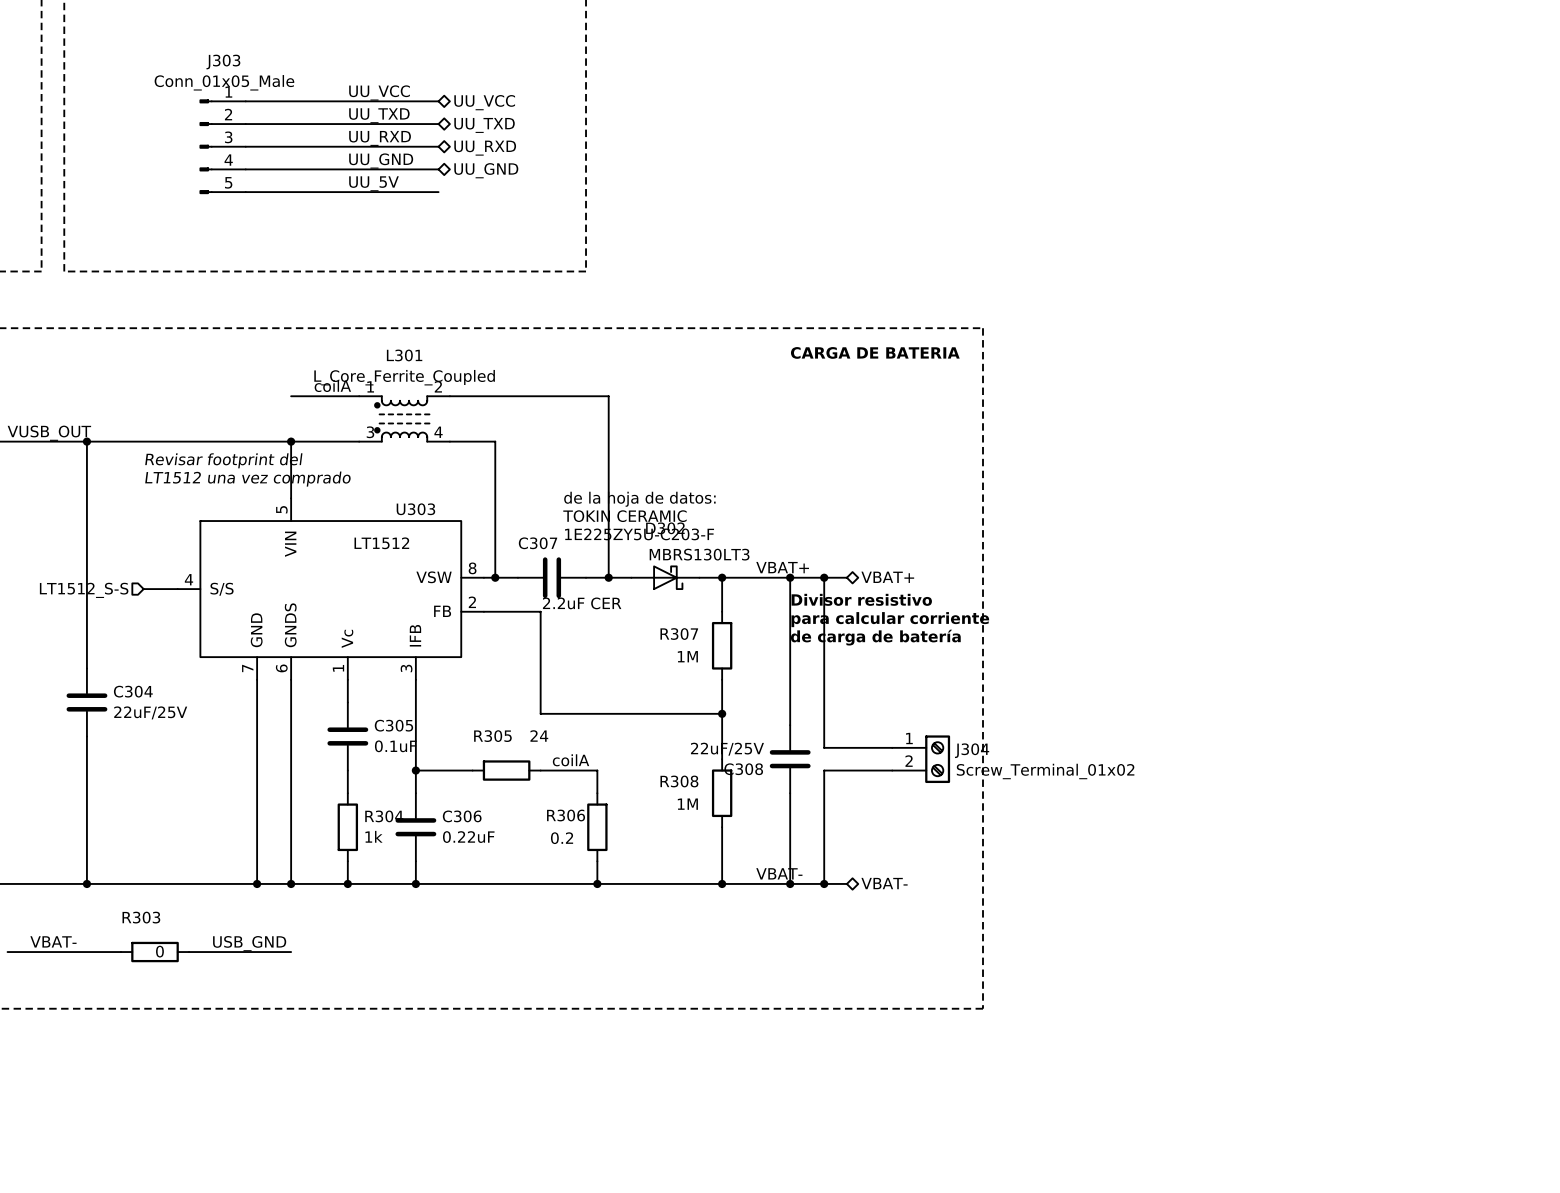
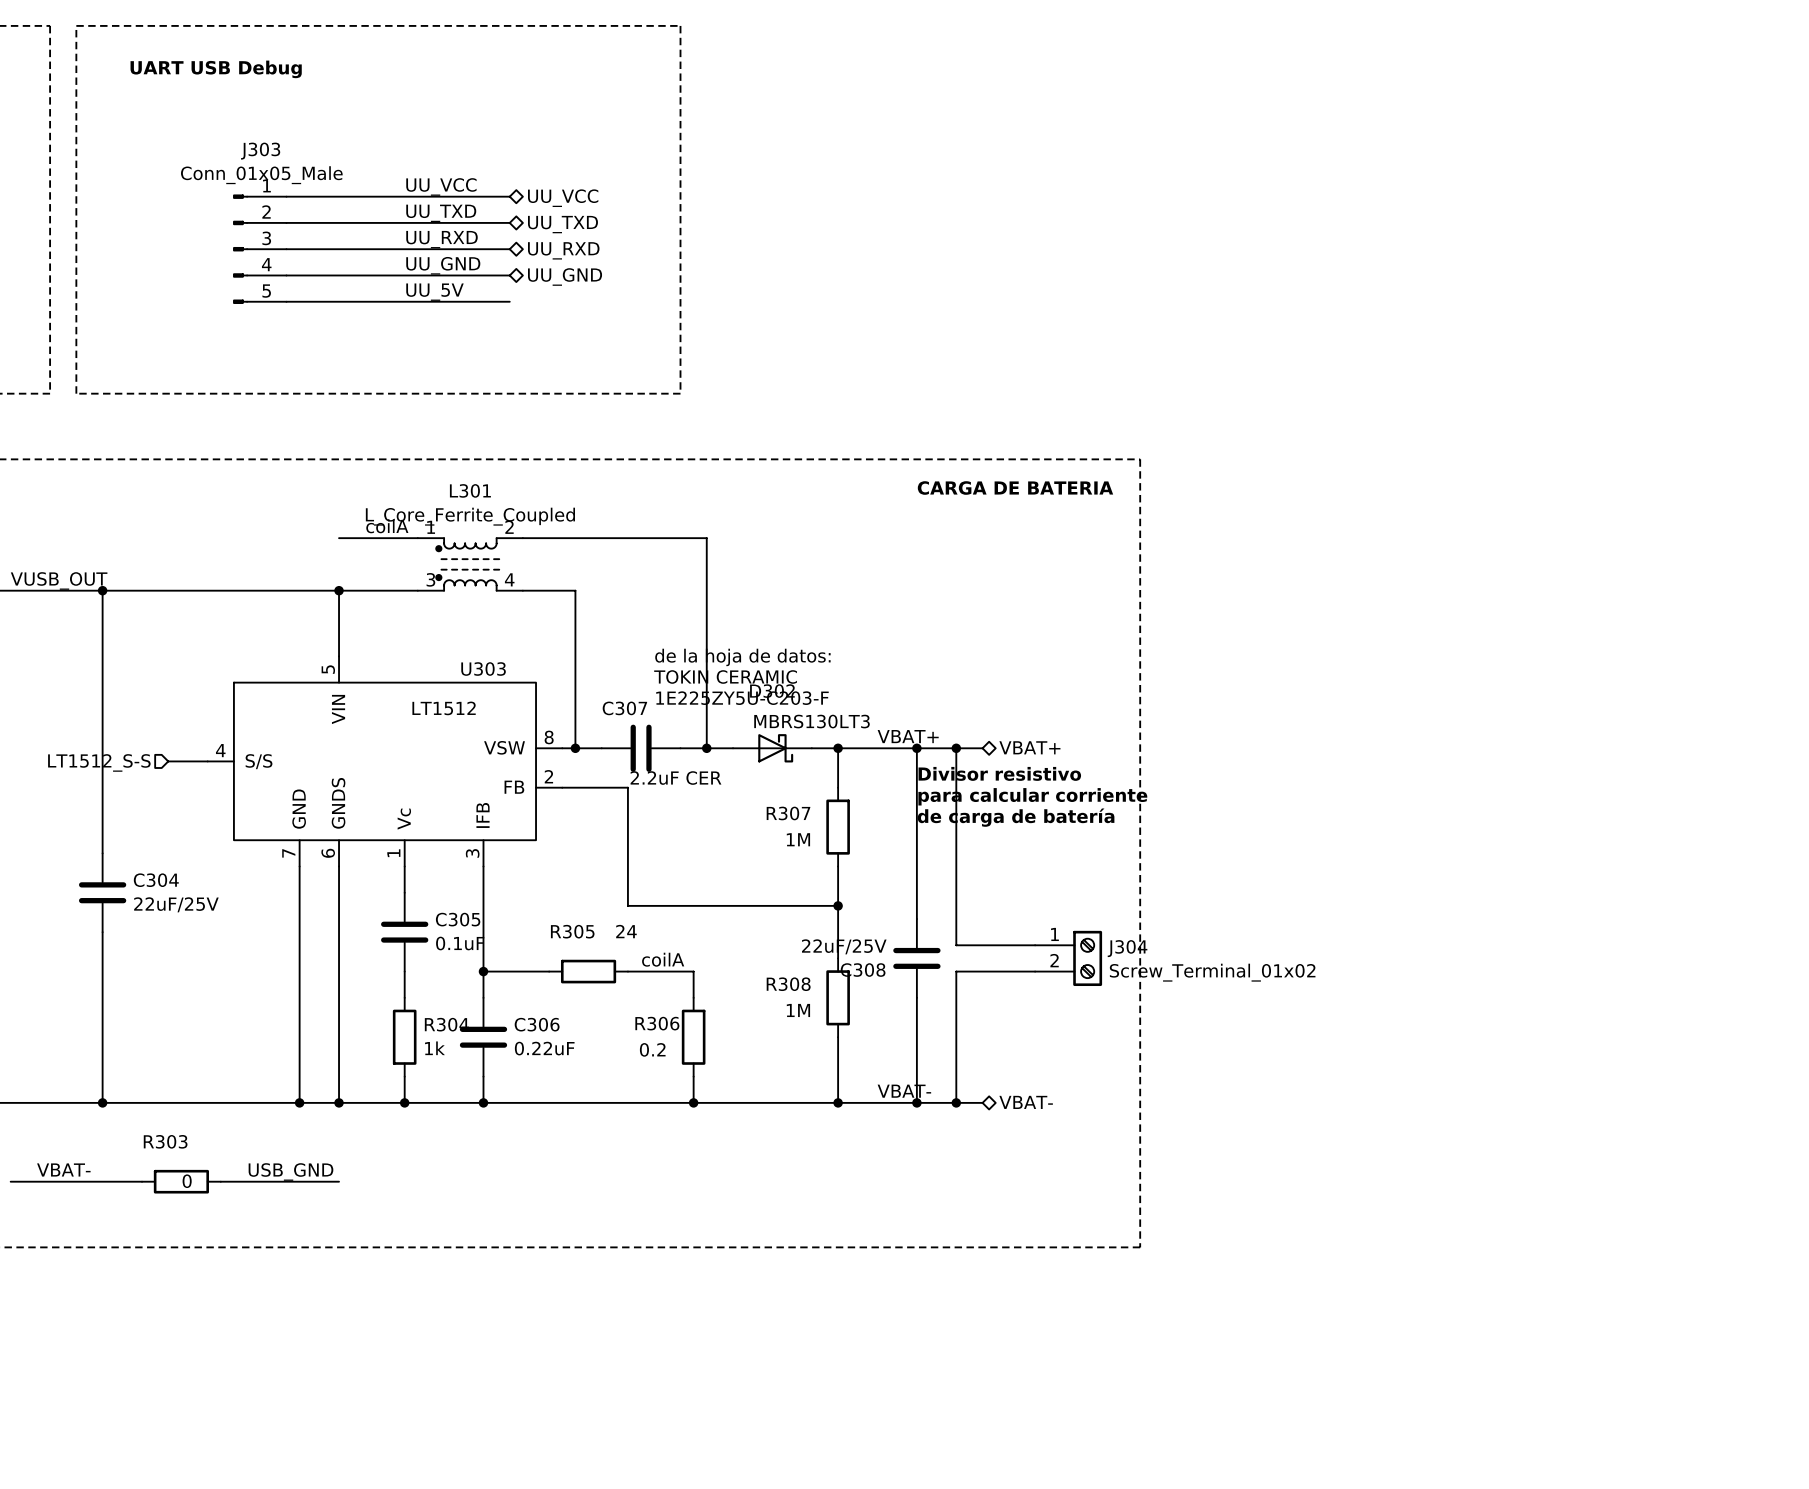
text: Revisar footprint del (223, 460) -> none
text: LT1512 una vez comprado (248, 479) -> none

